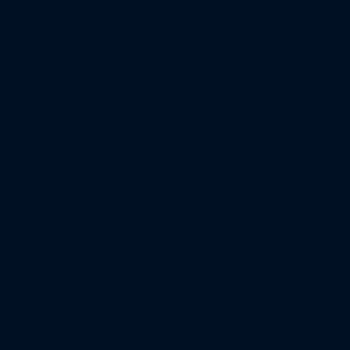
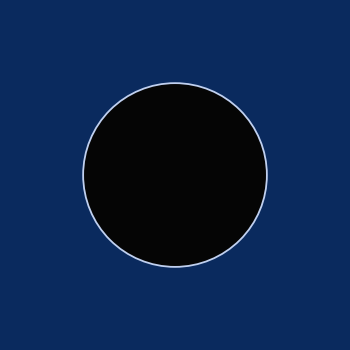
part: none -> (175, 175)

